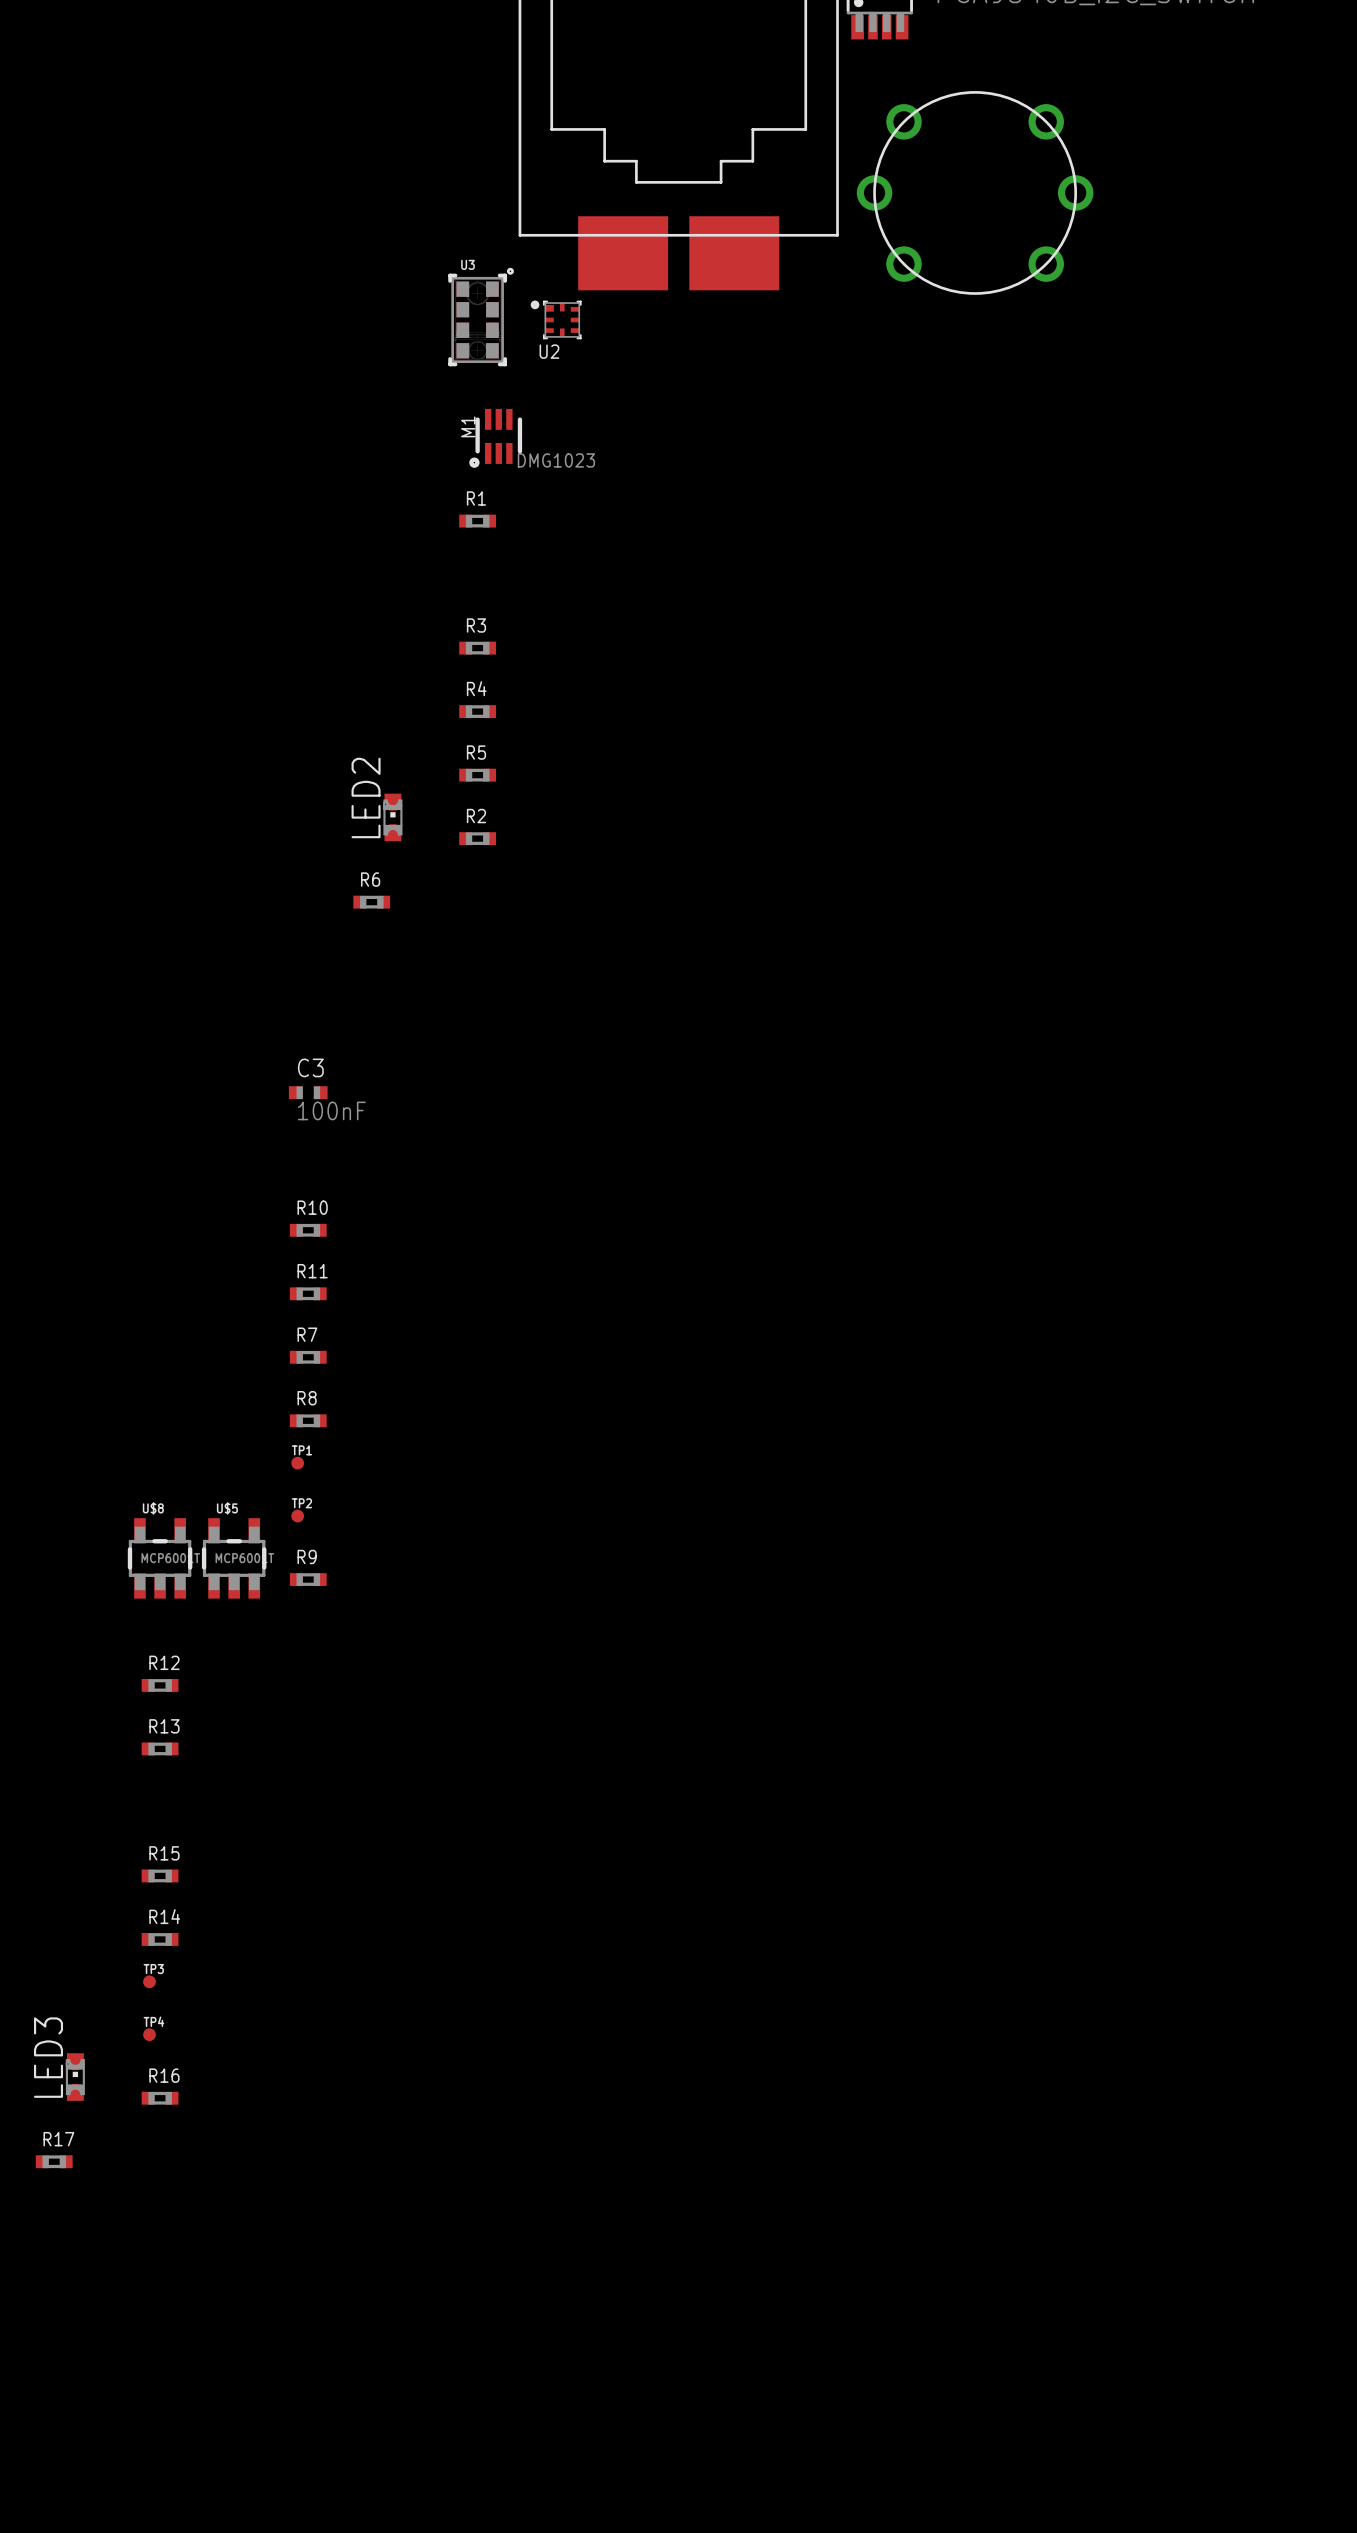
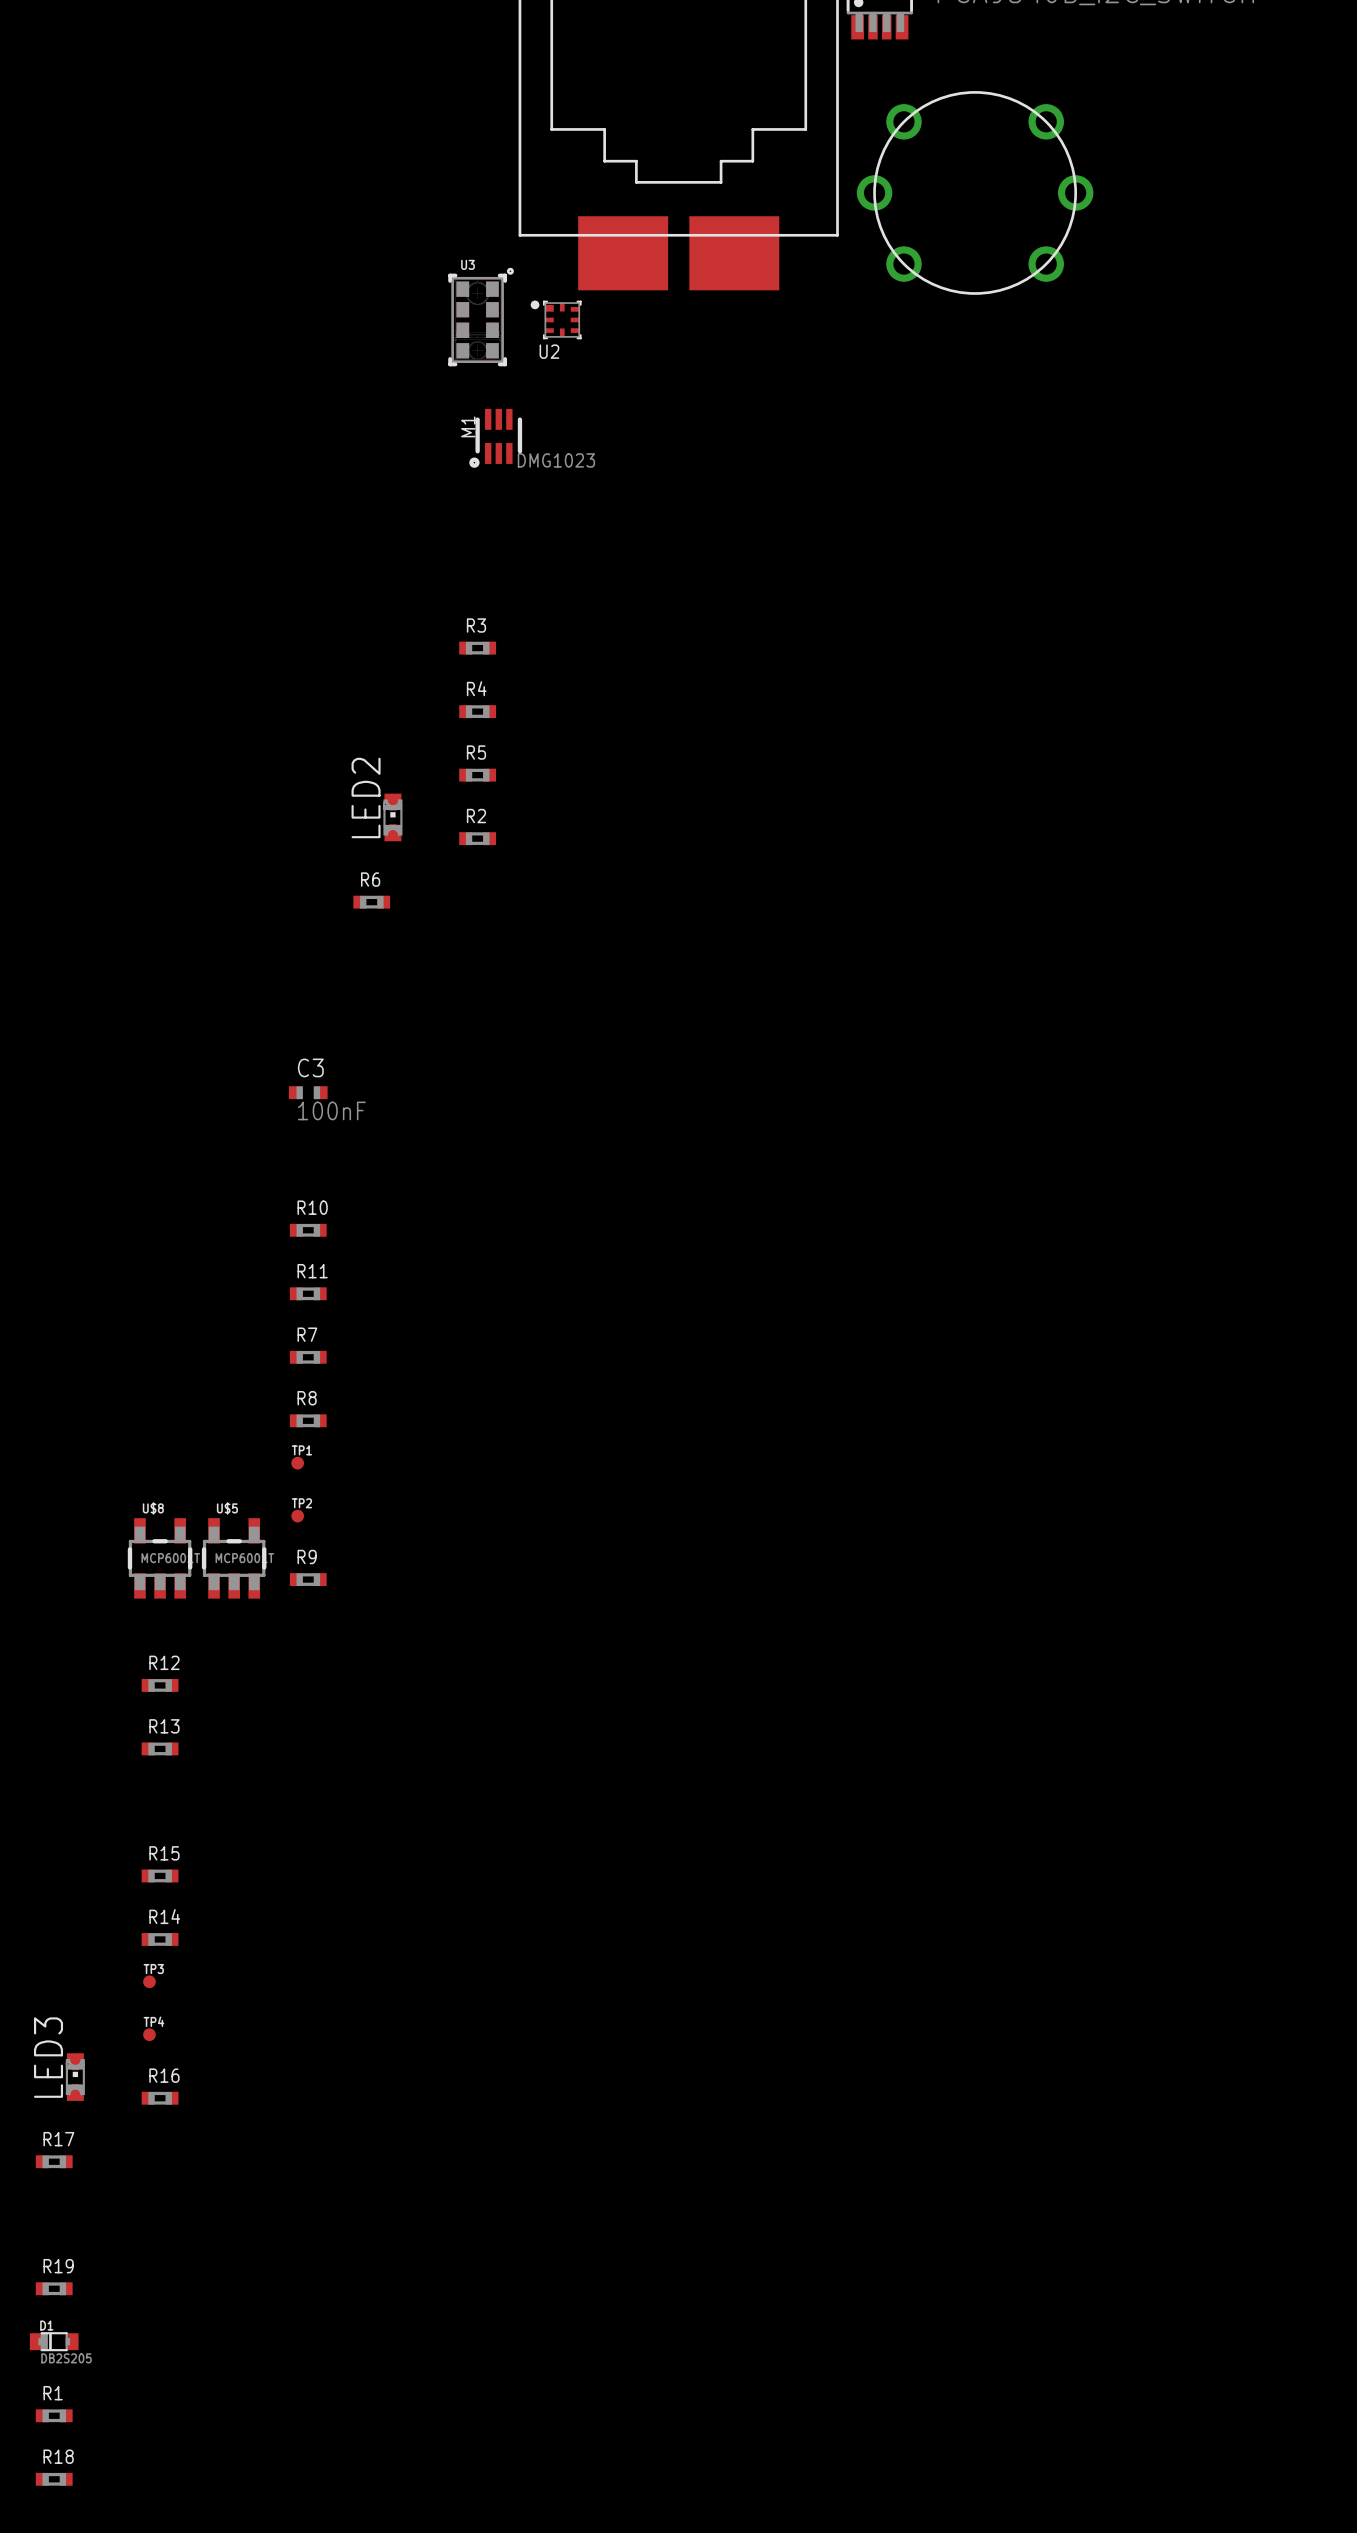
R1 position: (477, 521) -> (54, 2415)
R19: none -> (54, 2288)
D1: none -> DB2S205 (54, 2341)
R18: none -> (54, 2479)

